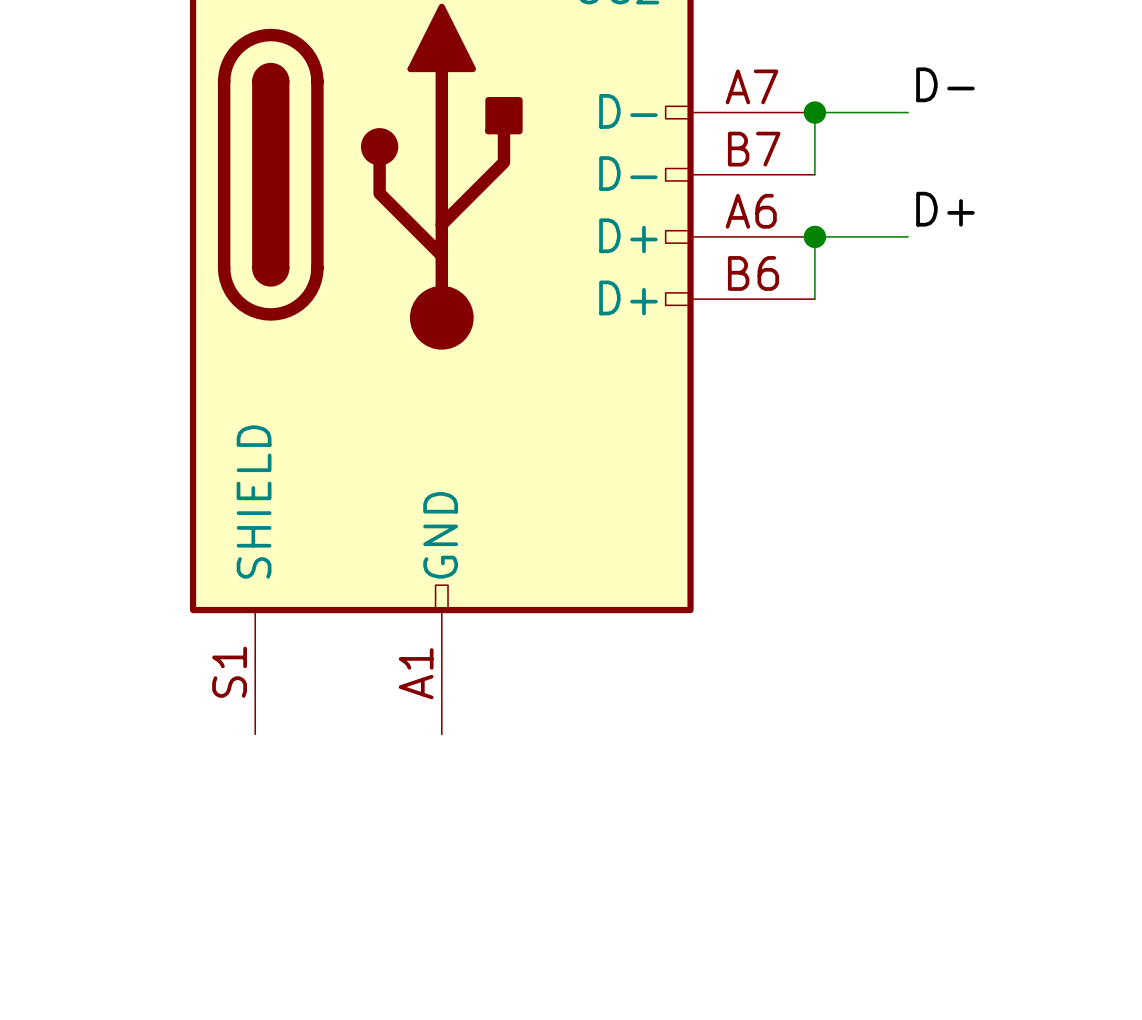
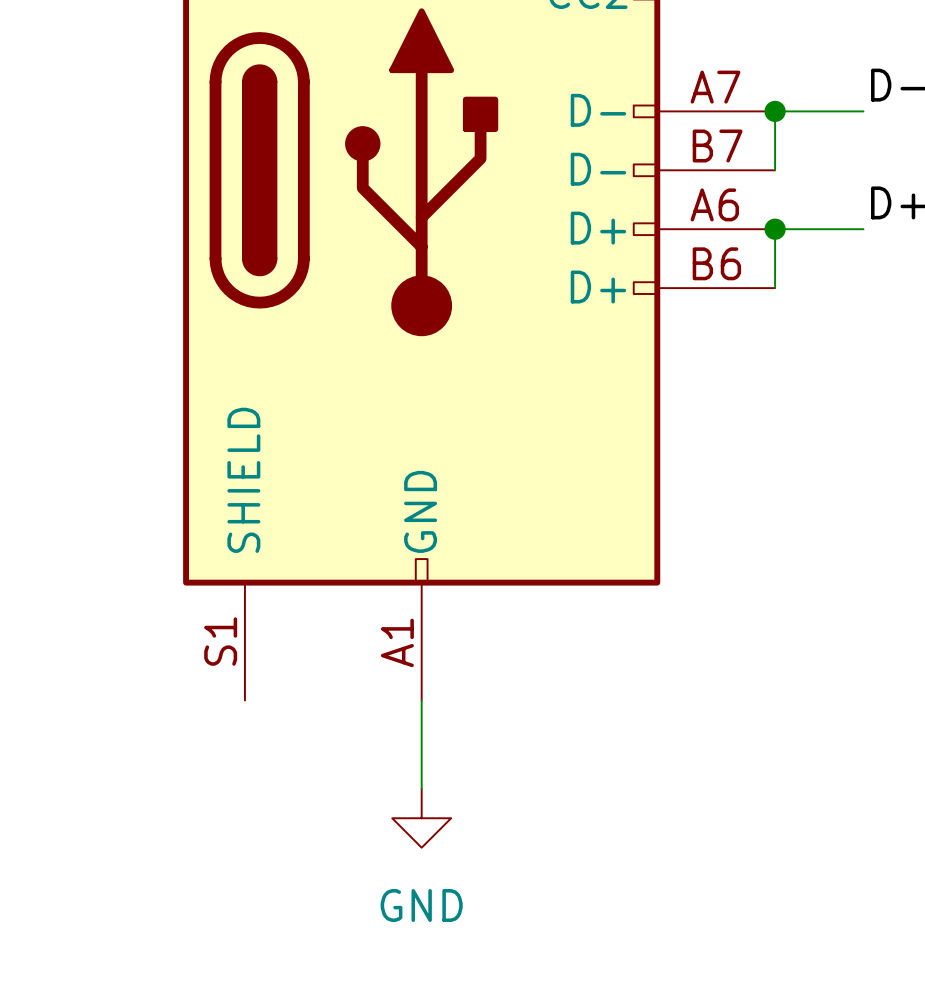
wire: none -> (421, 700) (421, 788)
power symbol: none -> GND (421, 818)

